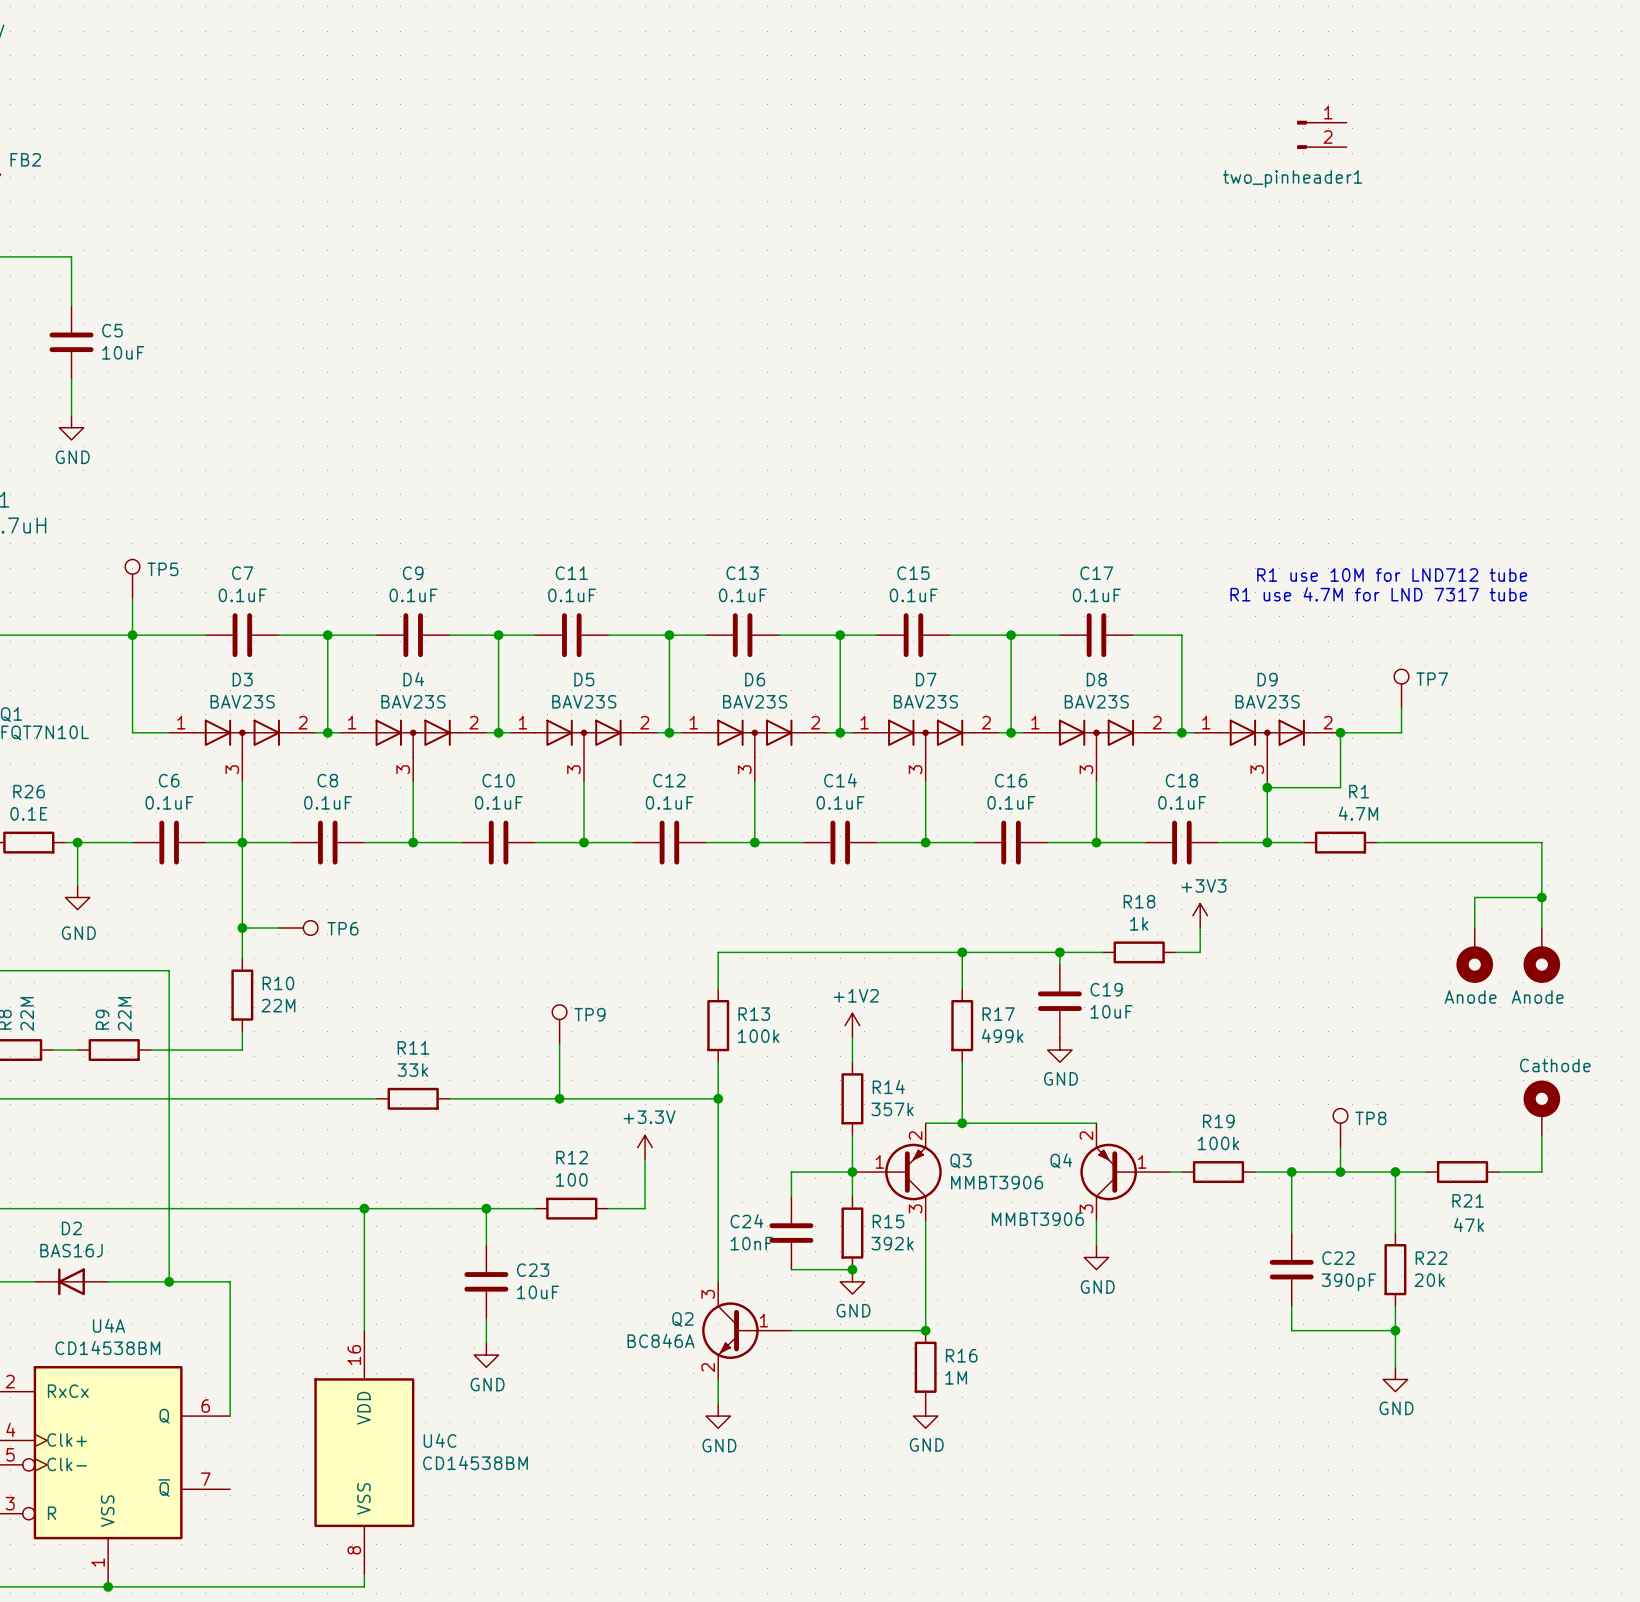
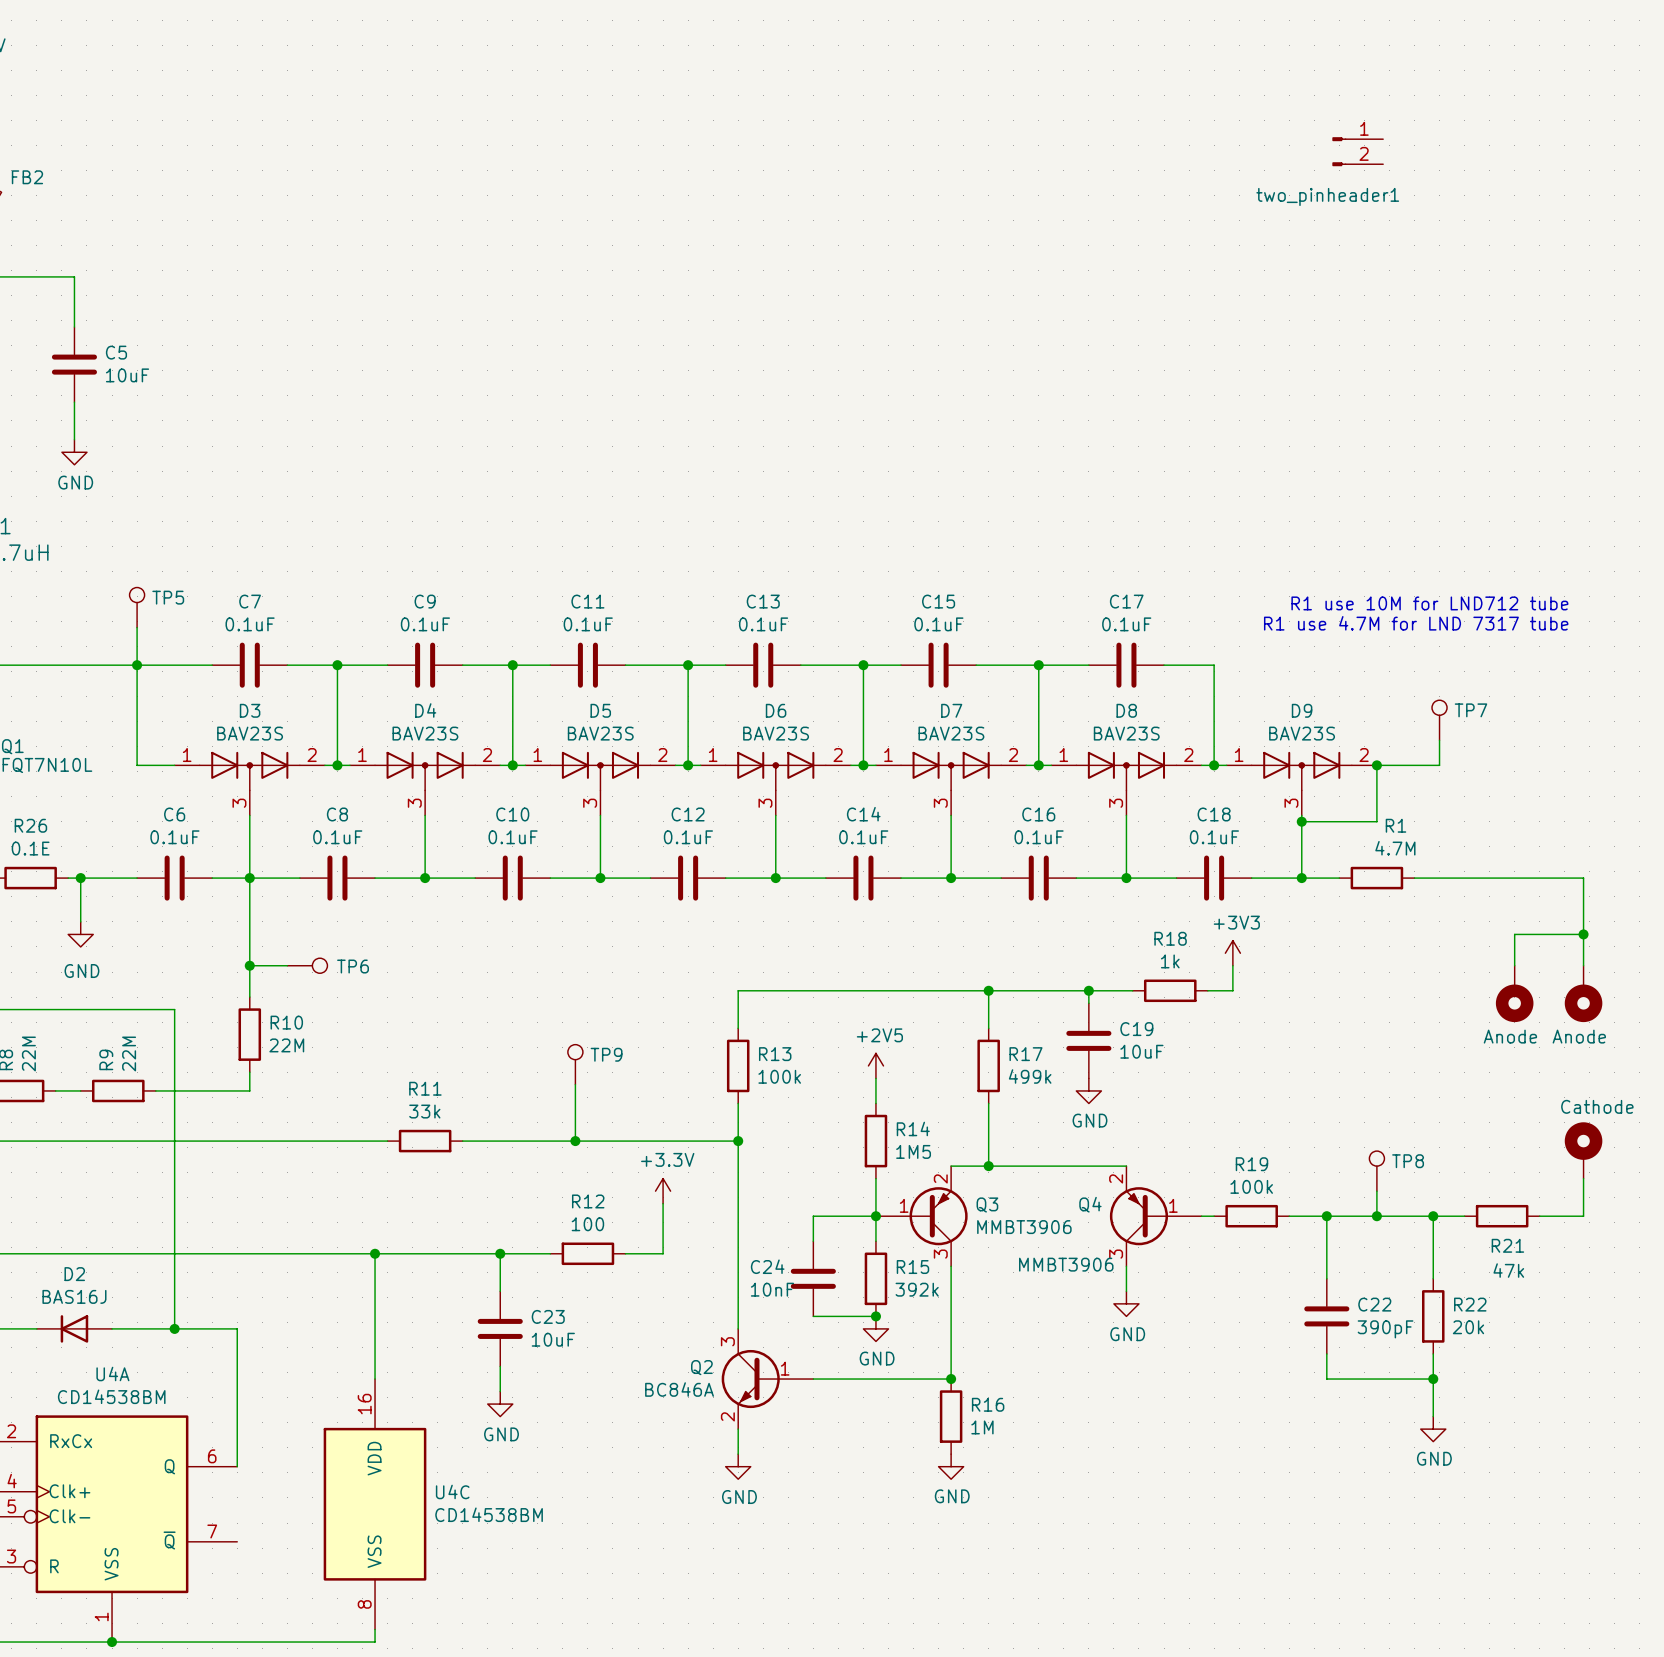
power symbol: +1V2 (852, 1025) -> +2V5 (875, 1065)
R14 value: 357k (892, 1109) -> 1M5 (913, 1151)

